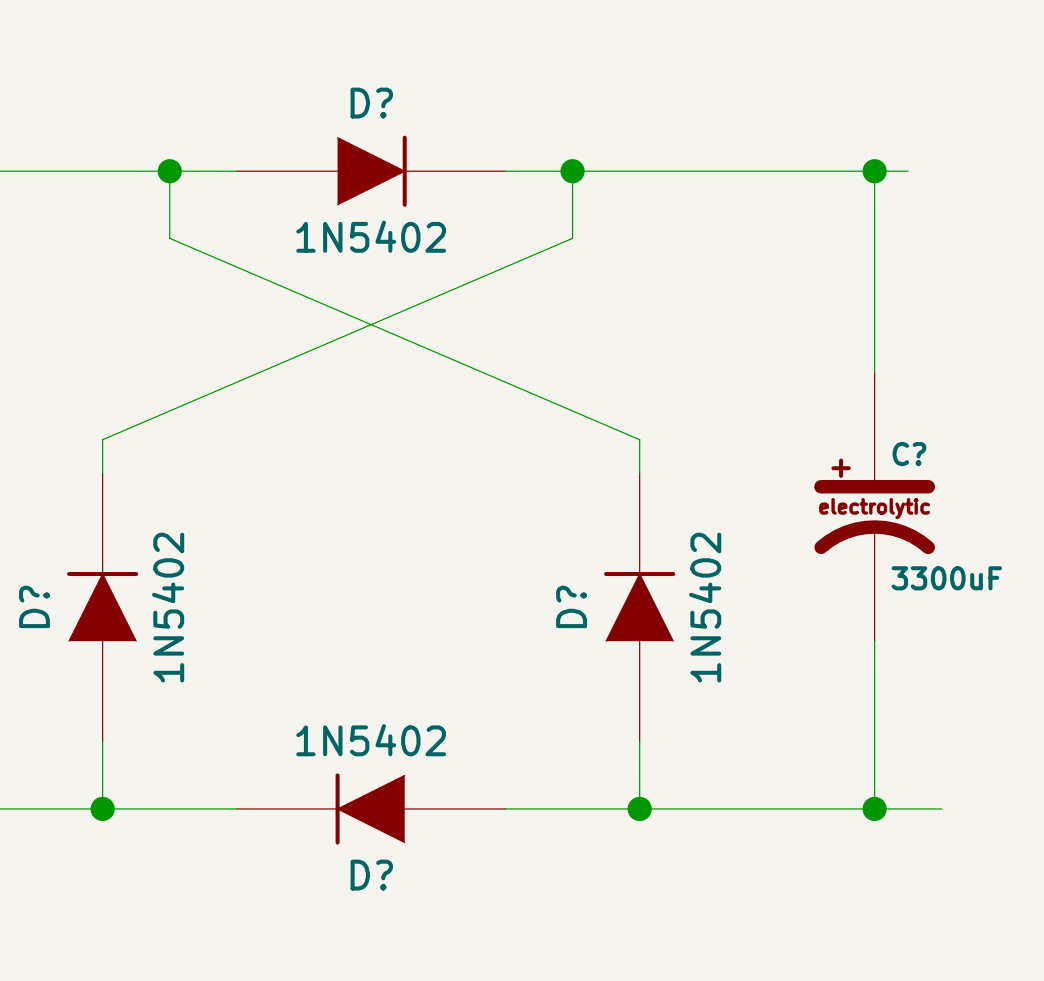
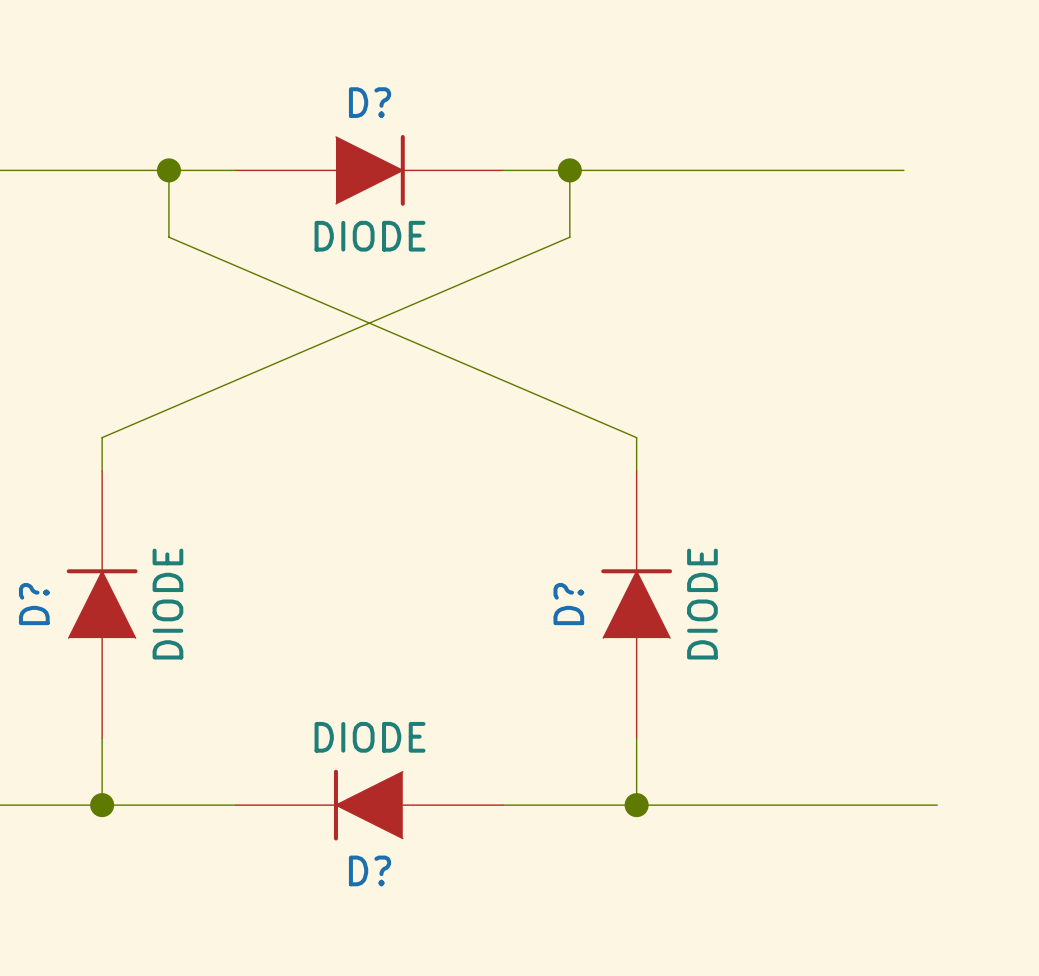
wire: (874, 171) (874, 372) -> none
junction: (874, 171) -> none
D? value: 1N5402 (371, 236) -> DIODE (370, 236)
C?: 3300uF (874, 506) -> none
D? value: 1N5402 (168, 607) -> DIODE (167, 604)
D? value: 1N5402 (705, 607) -> DIODE (702, 604)
wire: (874, 641) (874, 808) -> none
D? value: 1N5402 (371, 740) -> DIODE (370, 737)
junction: (874, 808) -> none

